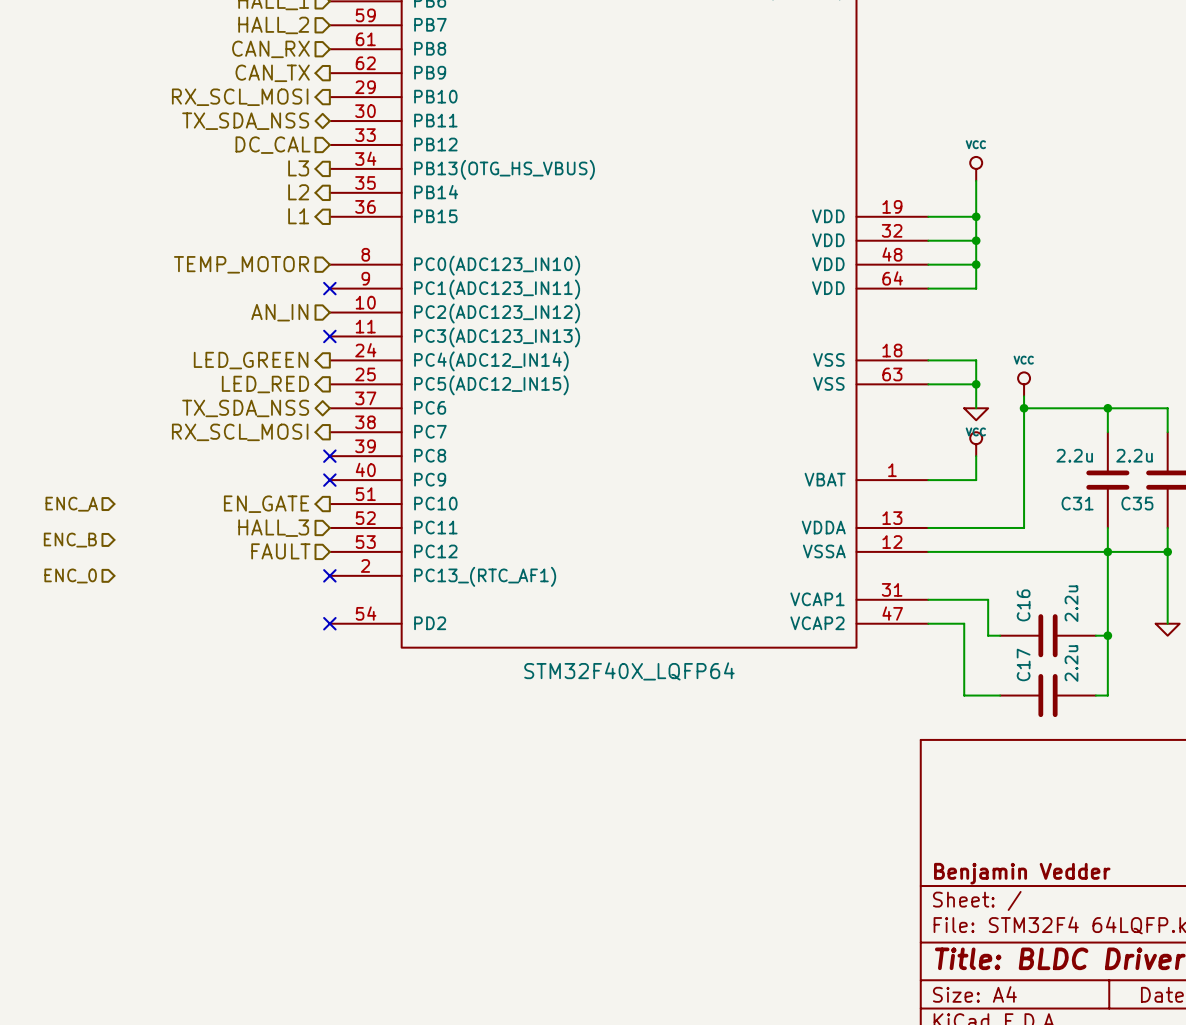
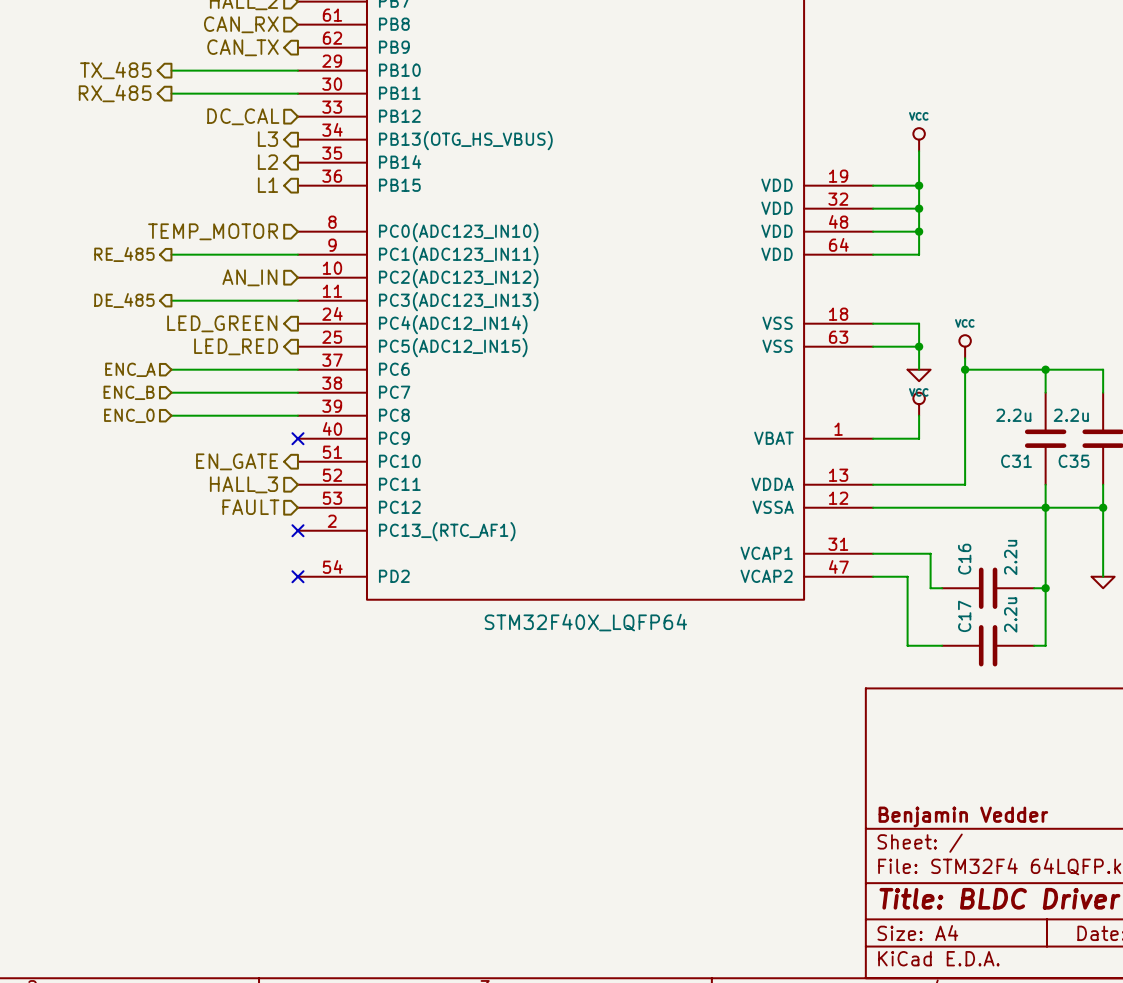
hierarchical label: none -> TX_485 (115, 70)
wire: none -> (171, 70) (297, 70)
hierarchical label: RX_SCL_MOSI (240, 97) -> none
hierarchical label: none -> RX_485 (115, 93)
wire: none -> (171, 93) (297, 93)
hierarchical label: TX_SDA_NSS (245, 121) -> none
hierarchical label: none -> RE_485 (124, 254)
wire: none -> (171, 254) (297, 254)
no-connect mark: (329, 288) -> none
hierarchical label: none -> DE_485 (124, 300)
wire: none -> (171, 300) (297, 300)
no-connect mark: (329, 336) -> none
wire: none -> (171, 369) (297, 369)
hierarchical label: TX_SDA_NSS (245, 408) -> none
wire: none -> (171, 392) (297, 392)
hierarchical label: RX_SCL_MOSI (240, 432) -> none
wire: none -> (171, 415) (297, 415)
no-connect mark: (329, 456) -> none
hierarchical label position: ENC_A (71, 504) -> ENC_A (130, 369)
hierarchical label position: ENC_B (70, 540) -> ENC_B (129, 392)
hierarchical label position: ENC_0 (70, 575) -> ENC_0 (129, 415)

